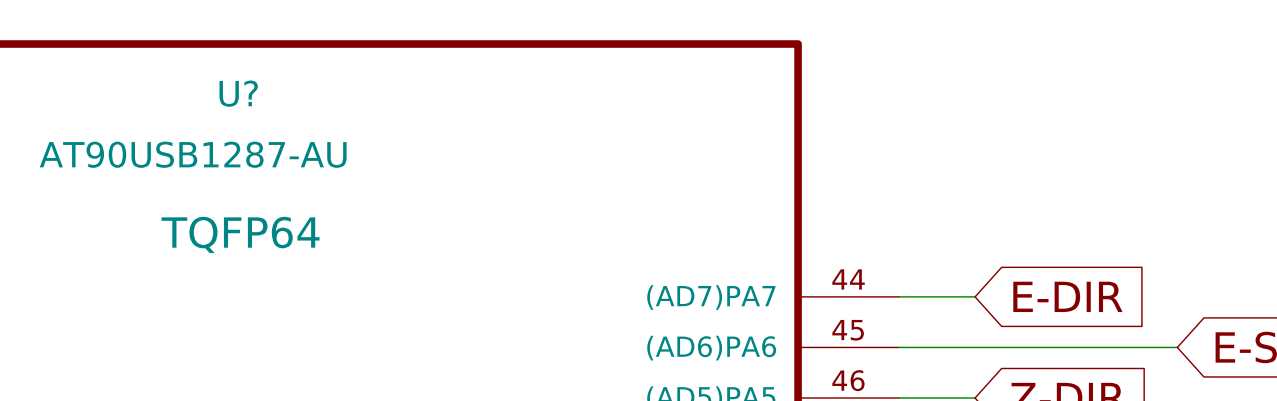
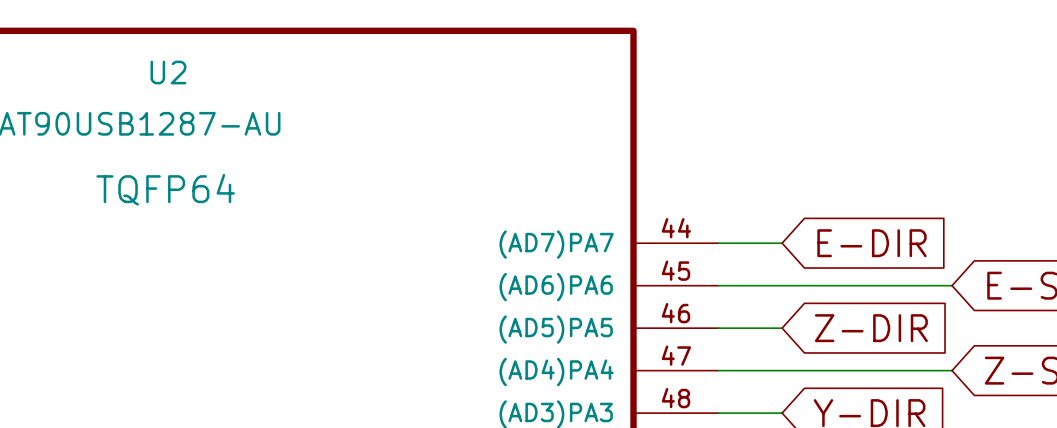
U? name: U? (238, 93) -> U2 (168, 72)

